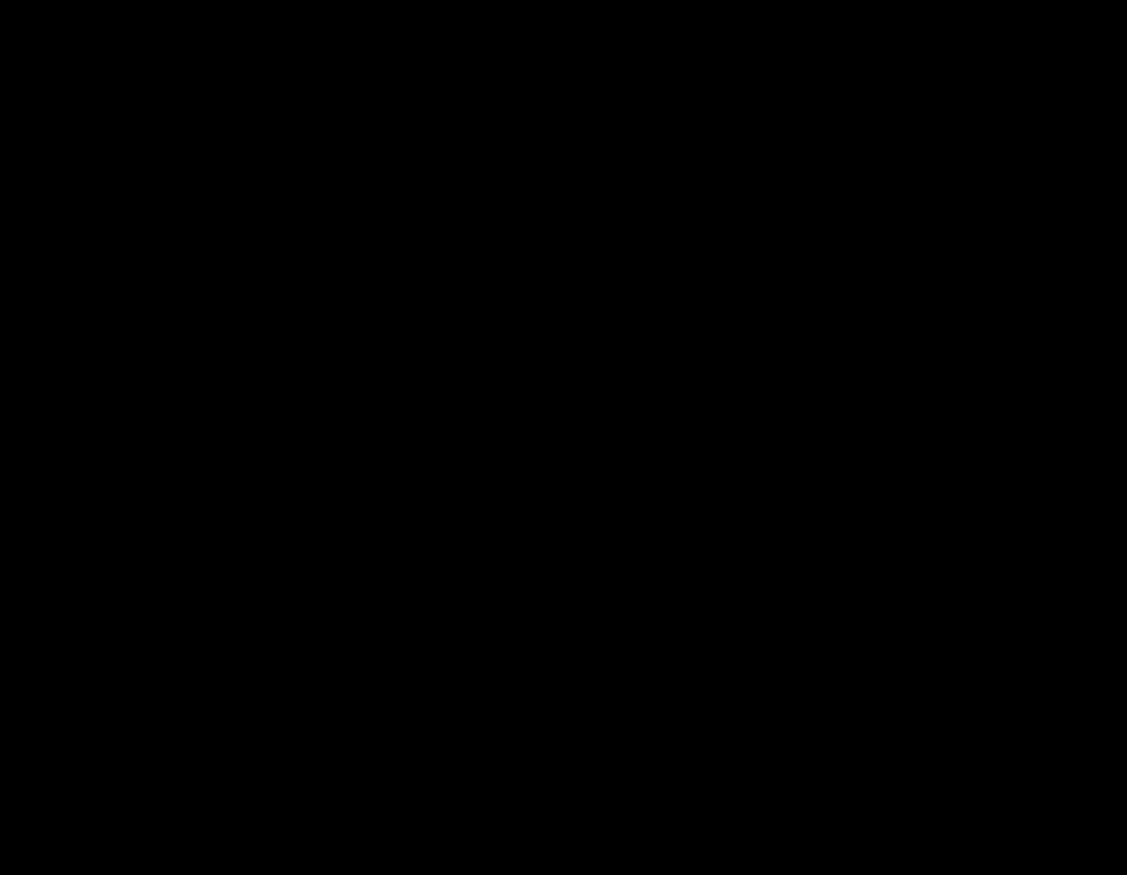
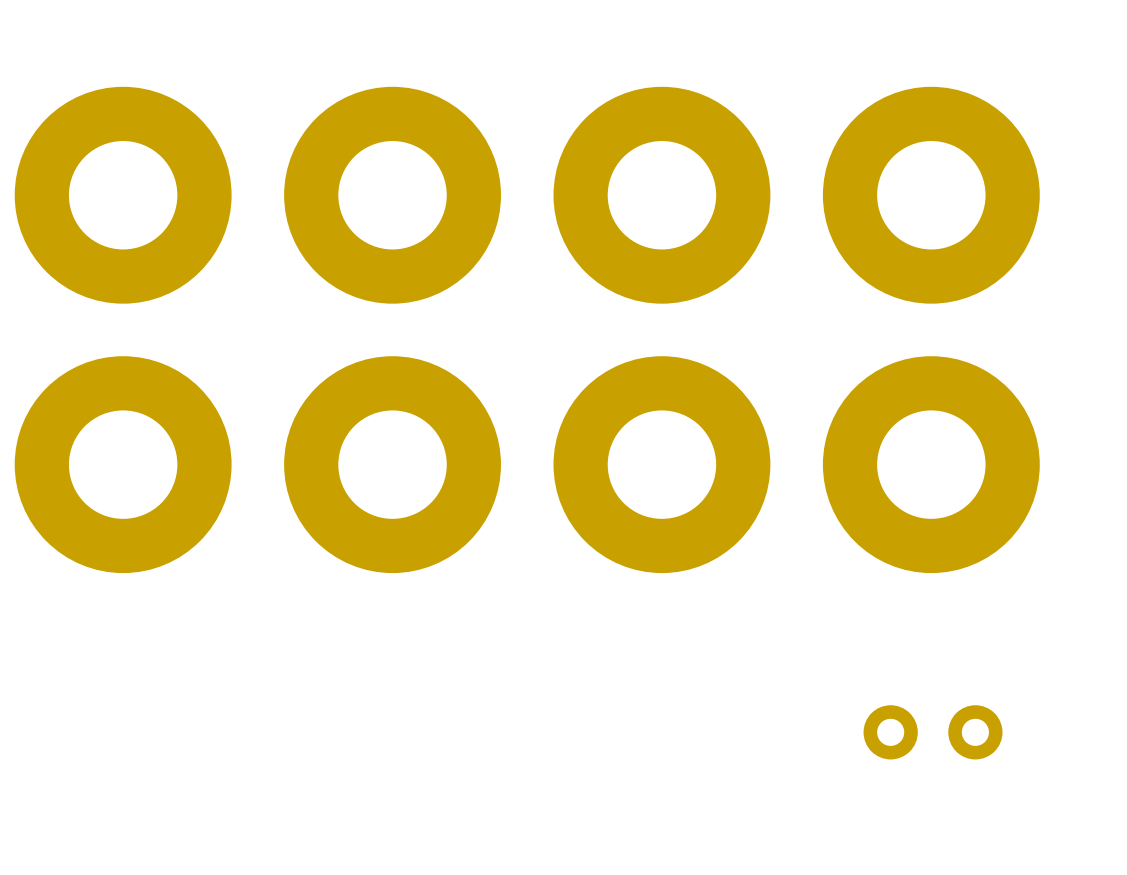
part: none -> (123, 195)
part: none -> (392, 195)
part: none -> (661, 195)
part: none -> (931, 195)
part: none -> (123, 464)
part: none -> (392, 464)
part: none -> (661, 464)
part: none -> (931, 464)
part: none -> (933, 732)

